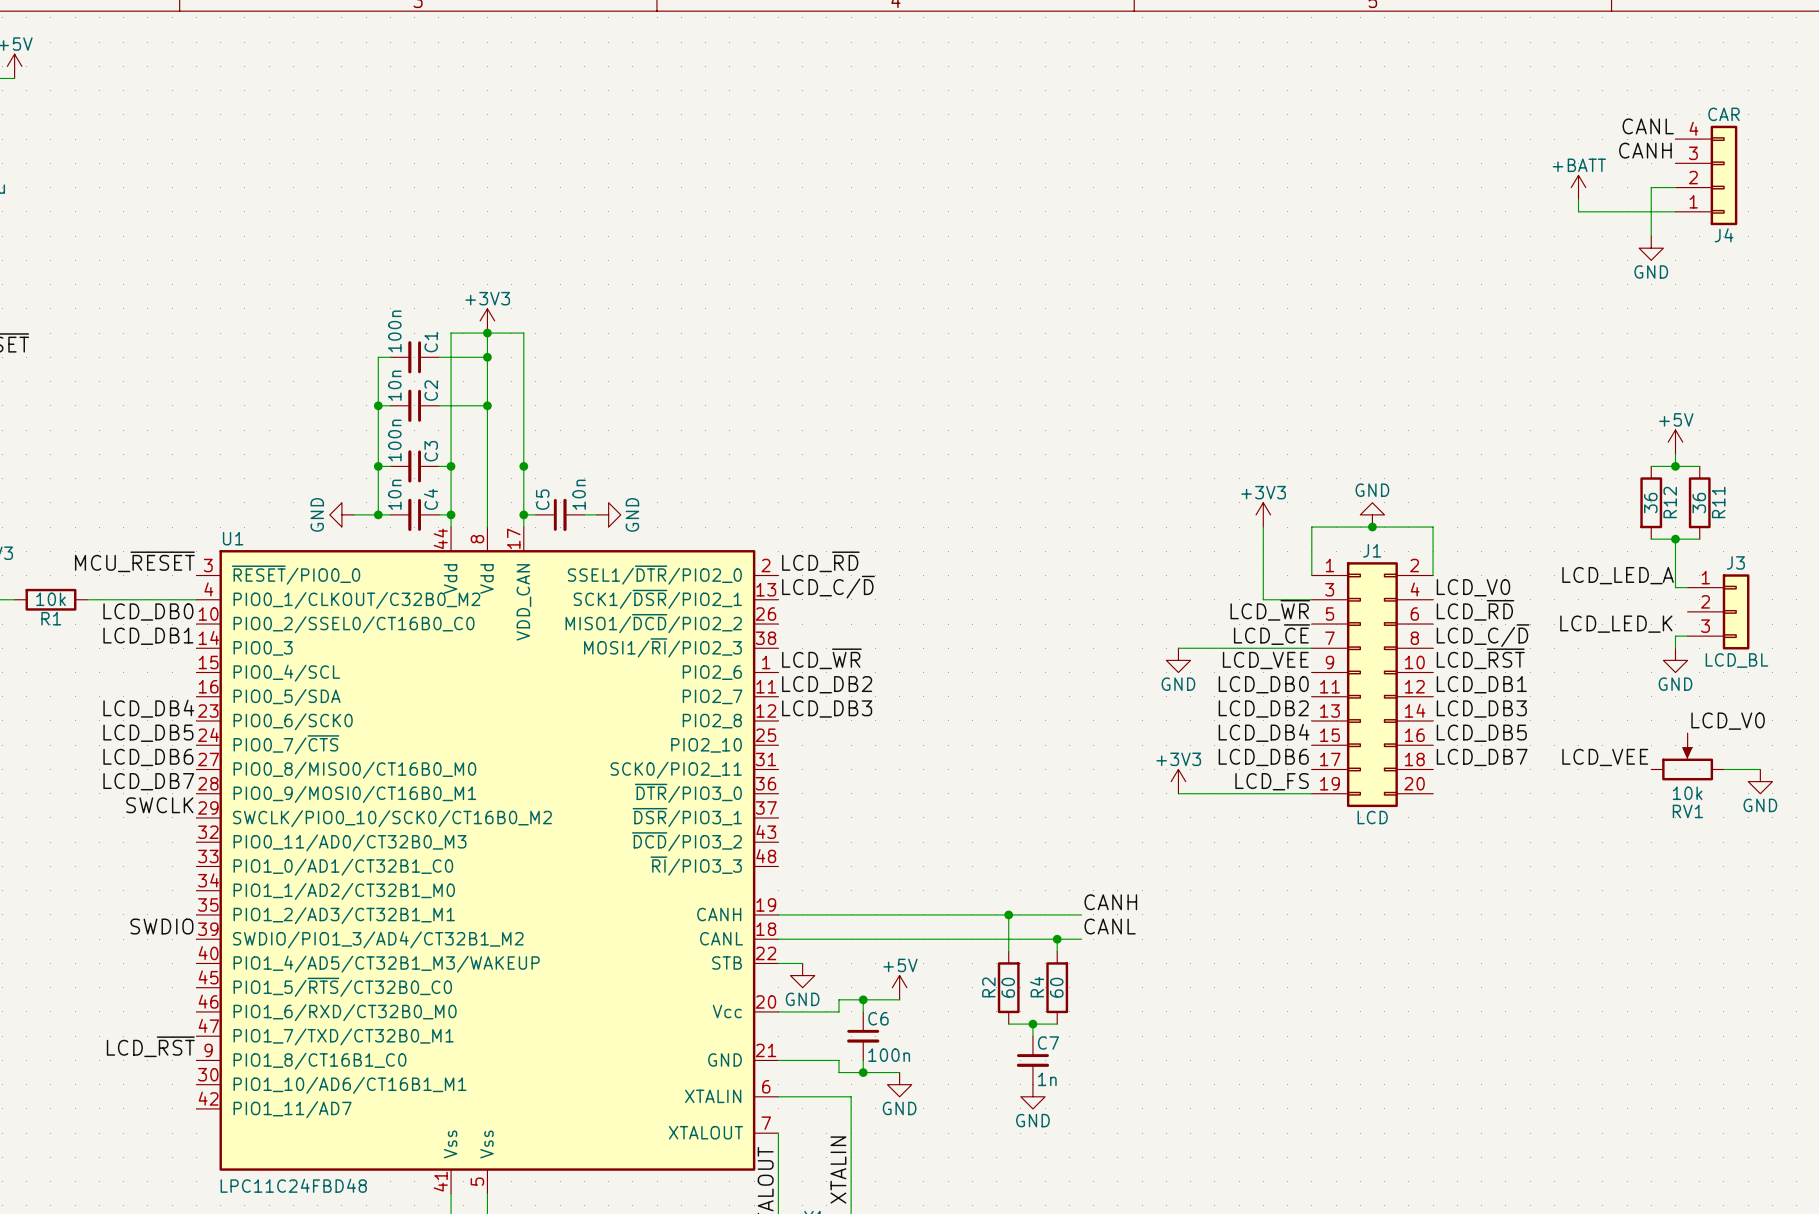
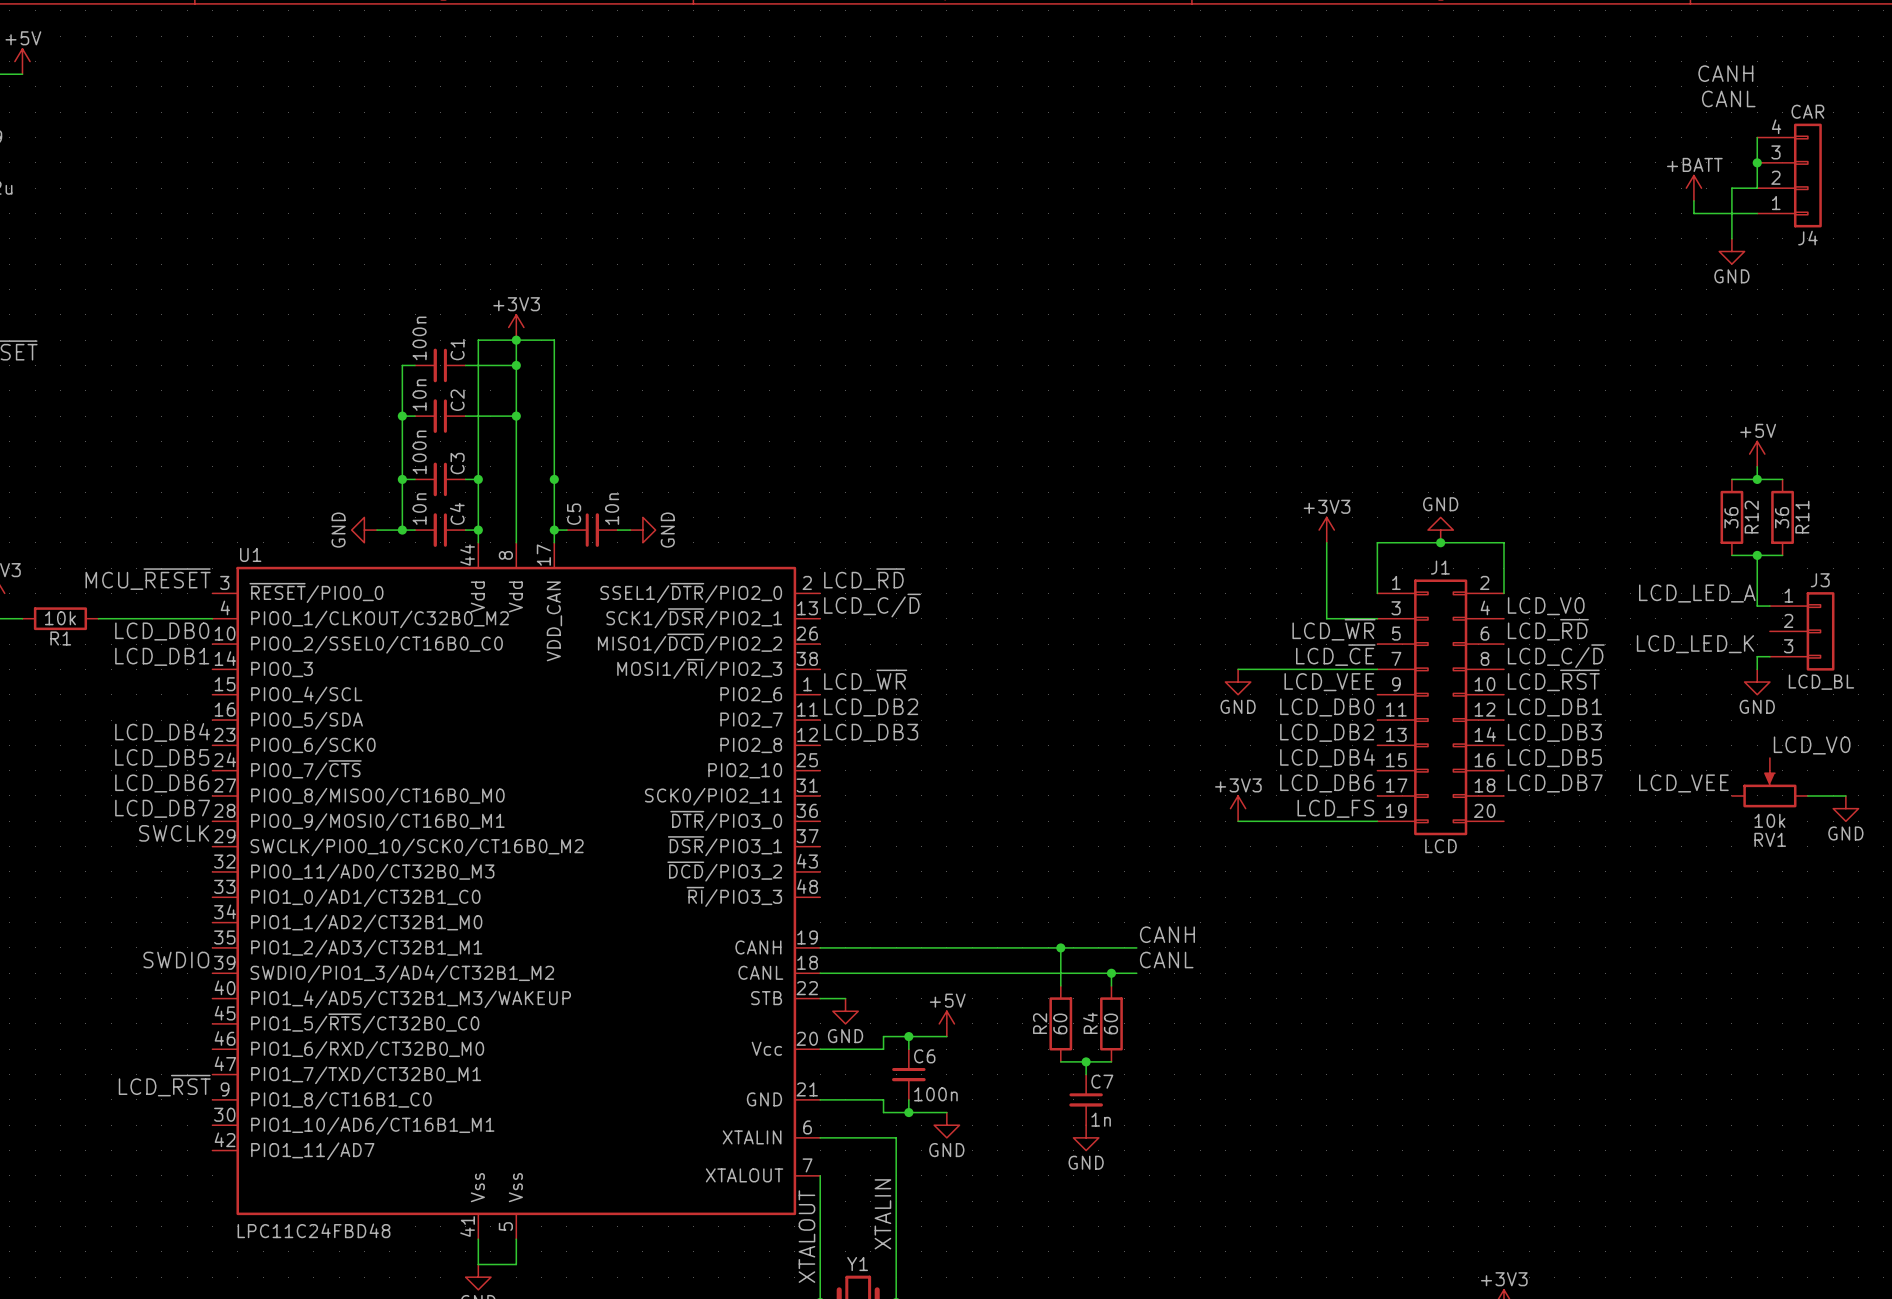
label position: CANL (1648, 126) -> CANL (1728, 98)
wire: none -> (1757, 137) (1757, 188)
label position: CANH (1645, 150) -> CANH (1725, 73)
junction: none -> (1757, 162)
power symbol position: +BATT (1578, 187) -> +BATT (1693, 188)
wire: (1578, 199) (1578, 211) (1614, 211) -> (1693, 200) (1693, 213)

